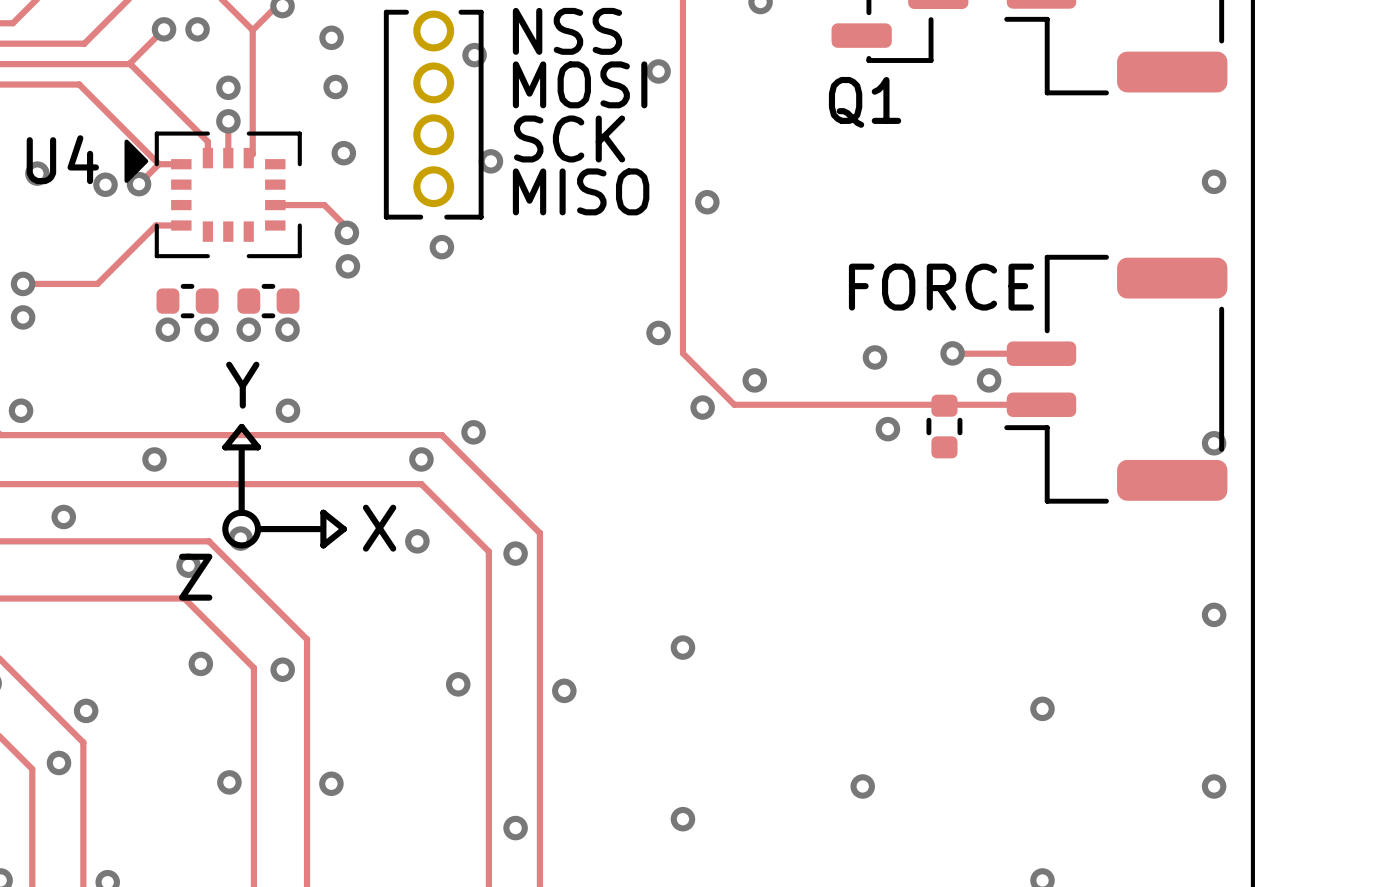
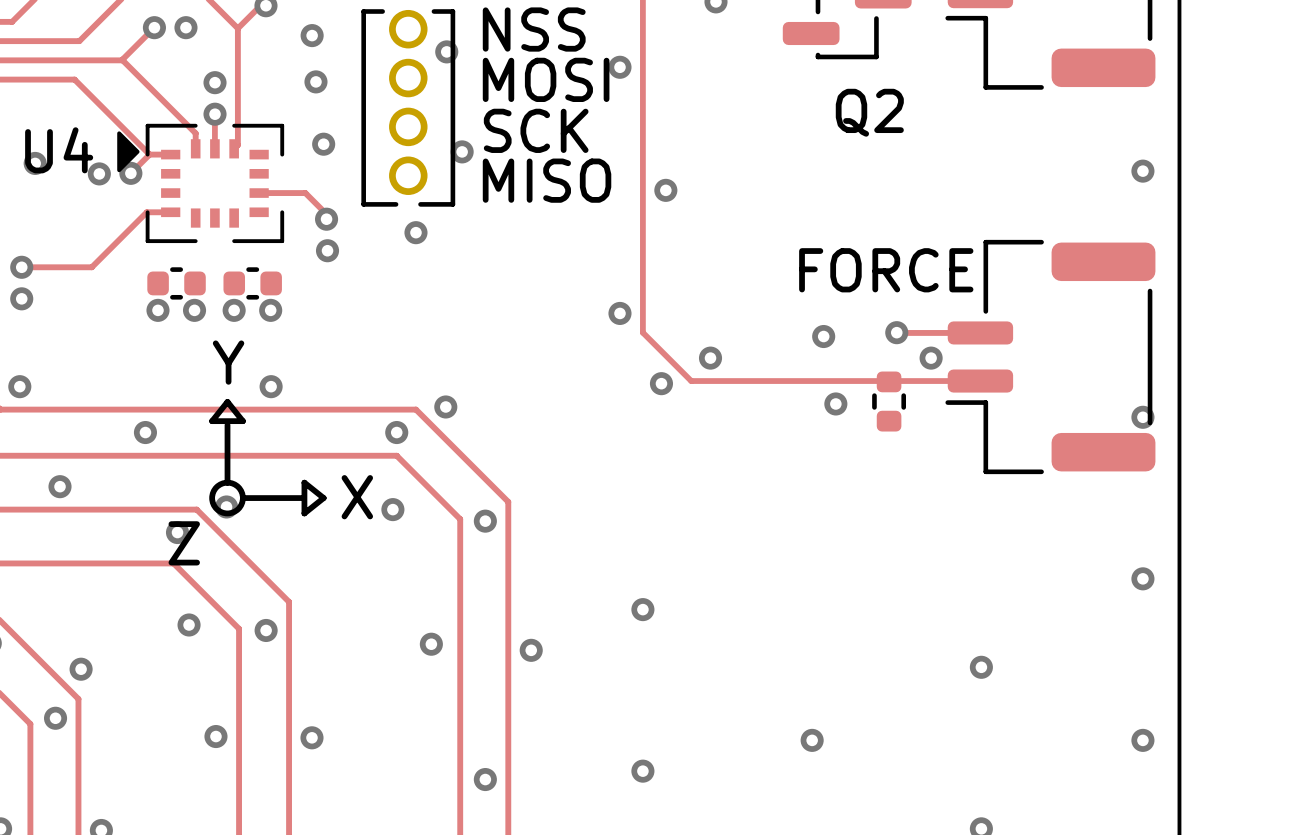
Q1 name: Q1 (865, 102) -> Q2 (869, 112)

